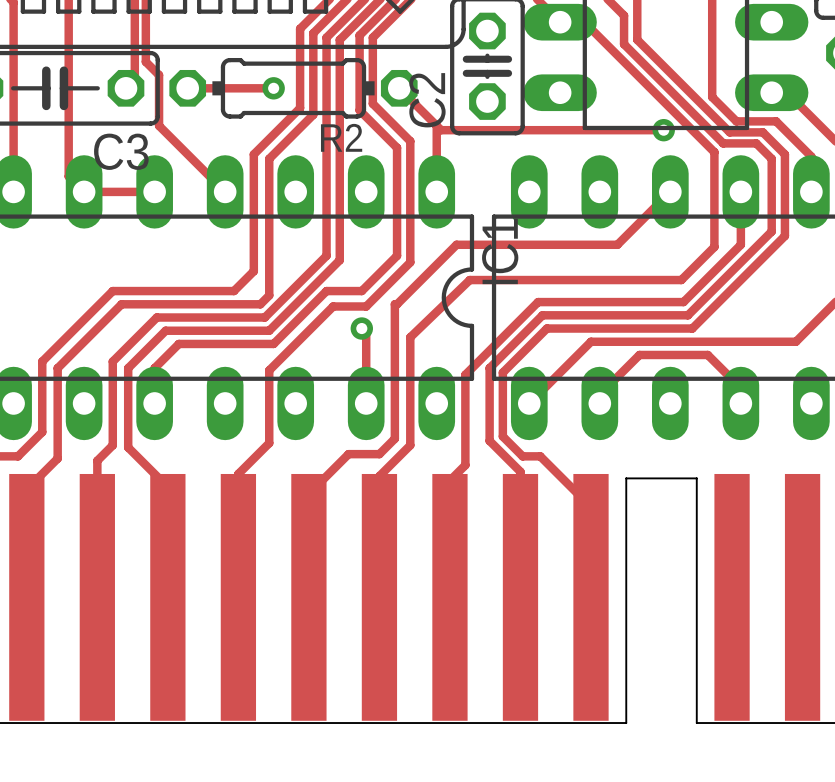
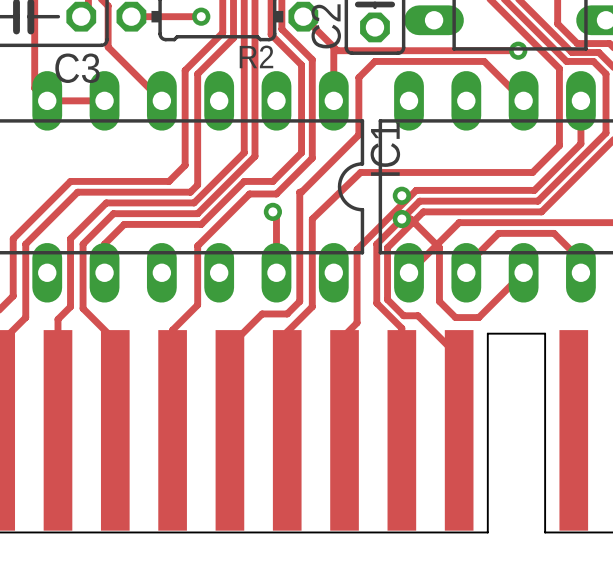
track: (670, 191) (617, 244) (456, 244) -> (523, 100) (484, 61) (374, 61) (358, 77) (358, 134) (349, 143)
via: none -> (401, 195)
track: none -> (401, 219) (410, 219) (439, 247) (439, 301) (455, 317) (478, 317) (523, 272)
via: none -> (401, 219)

